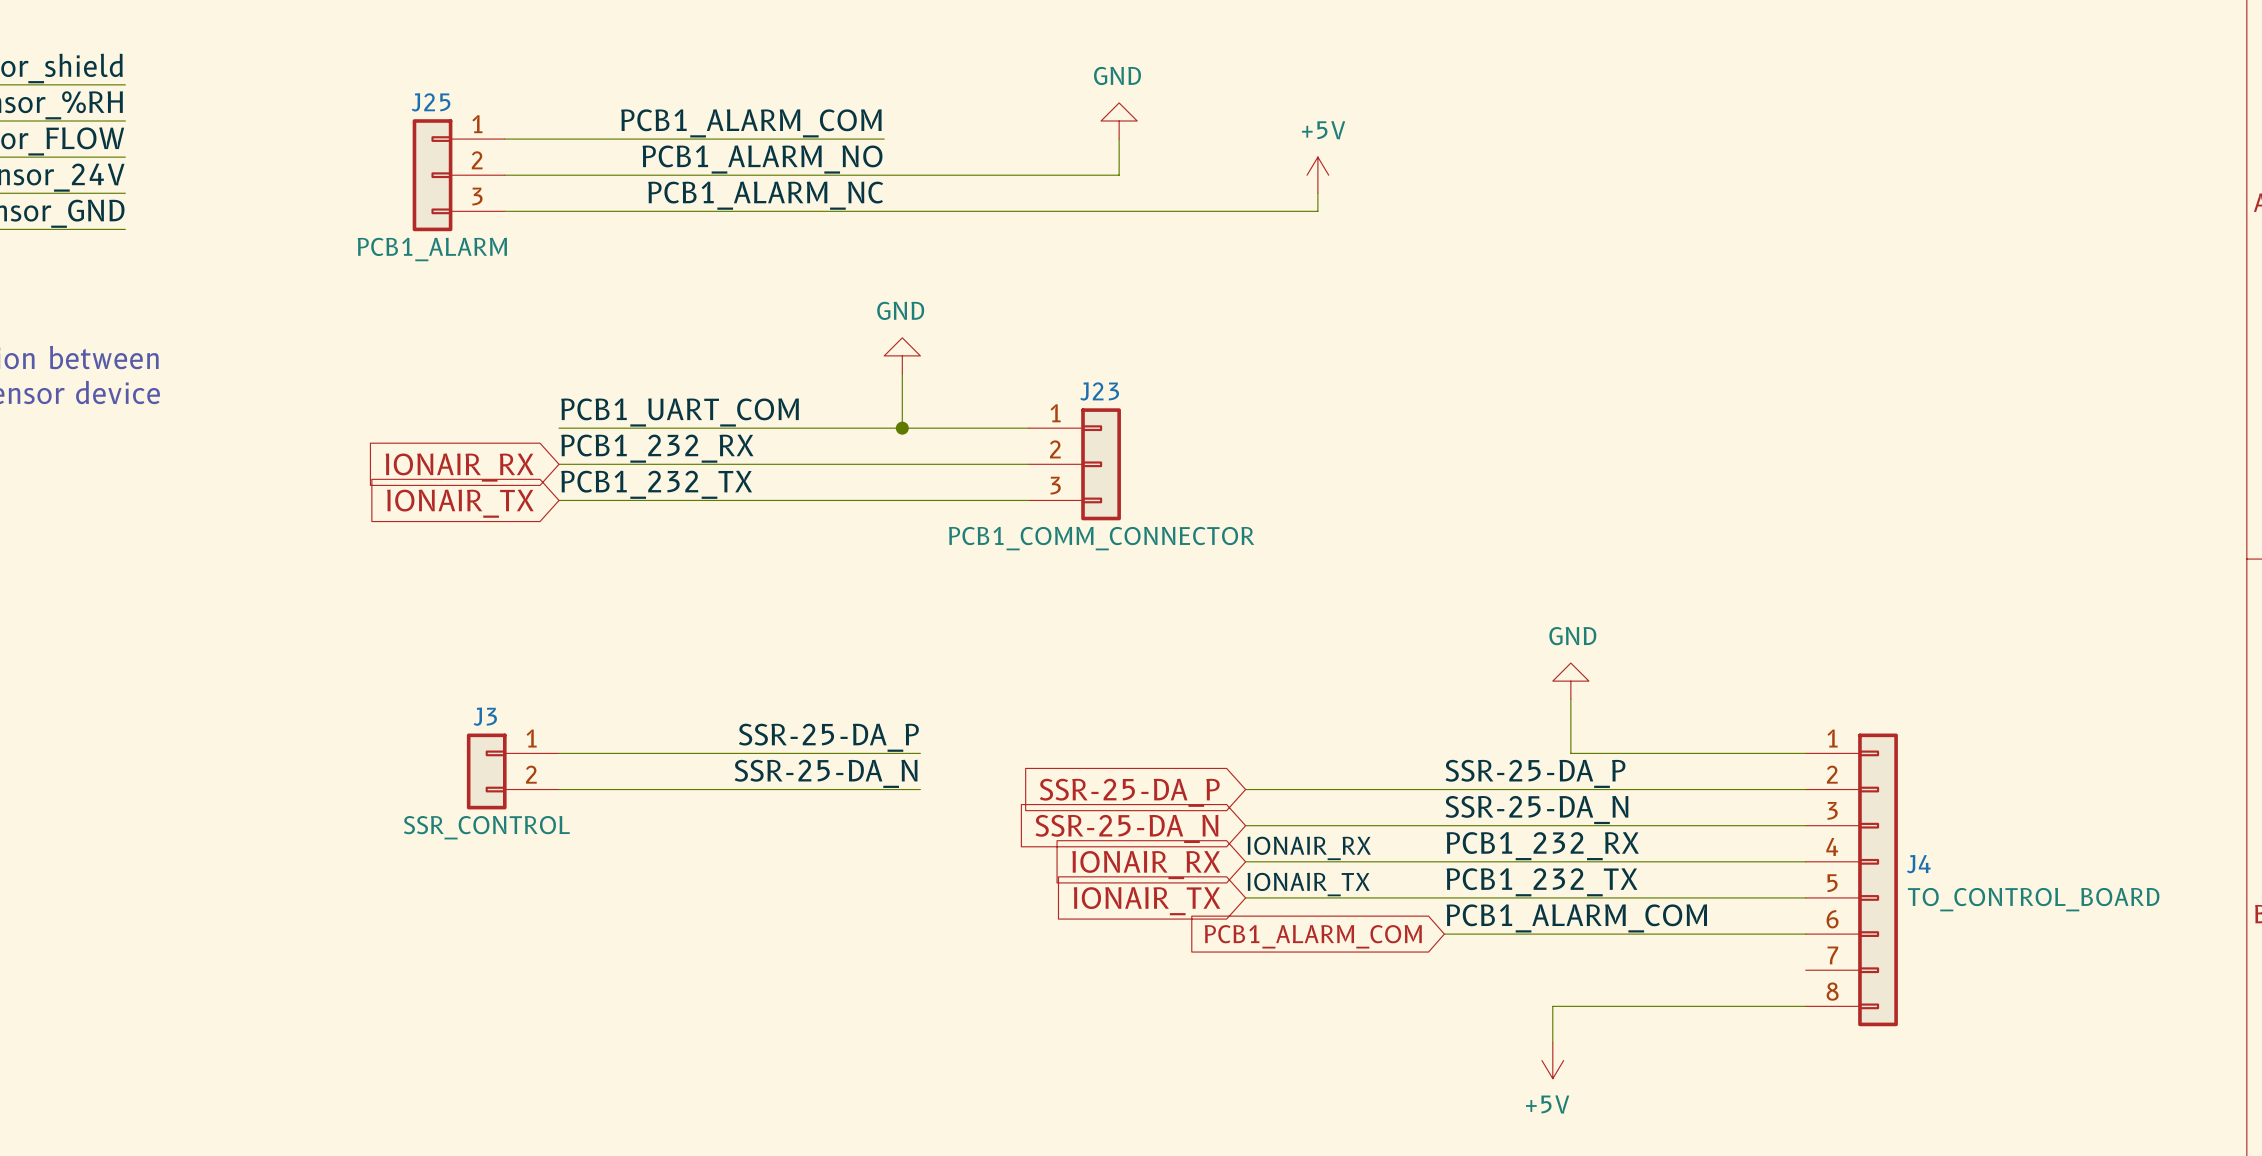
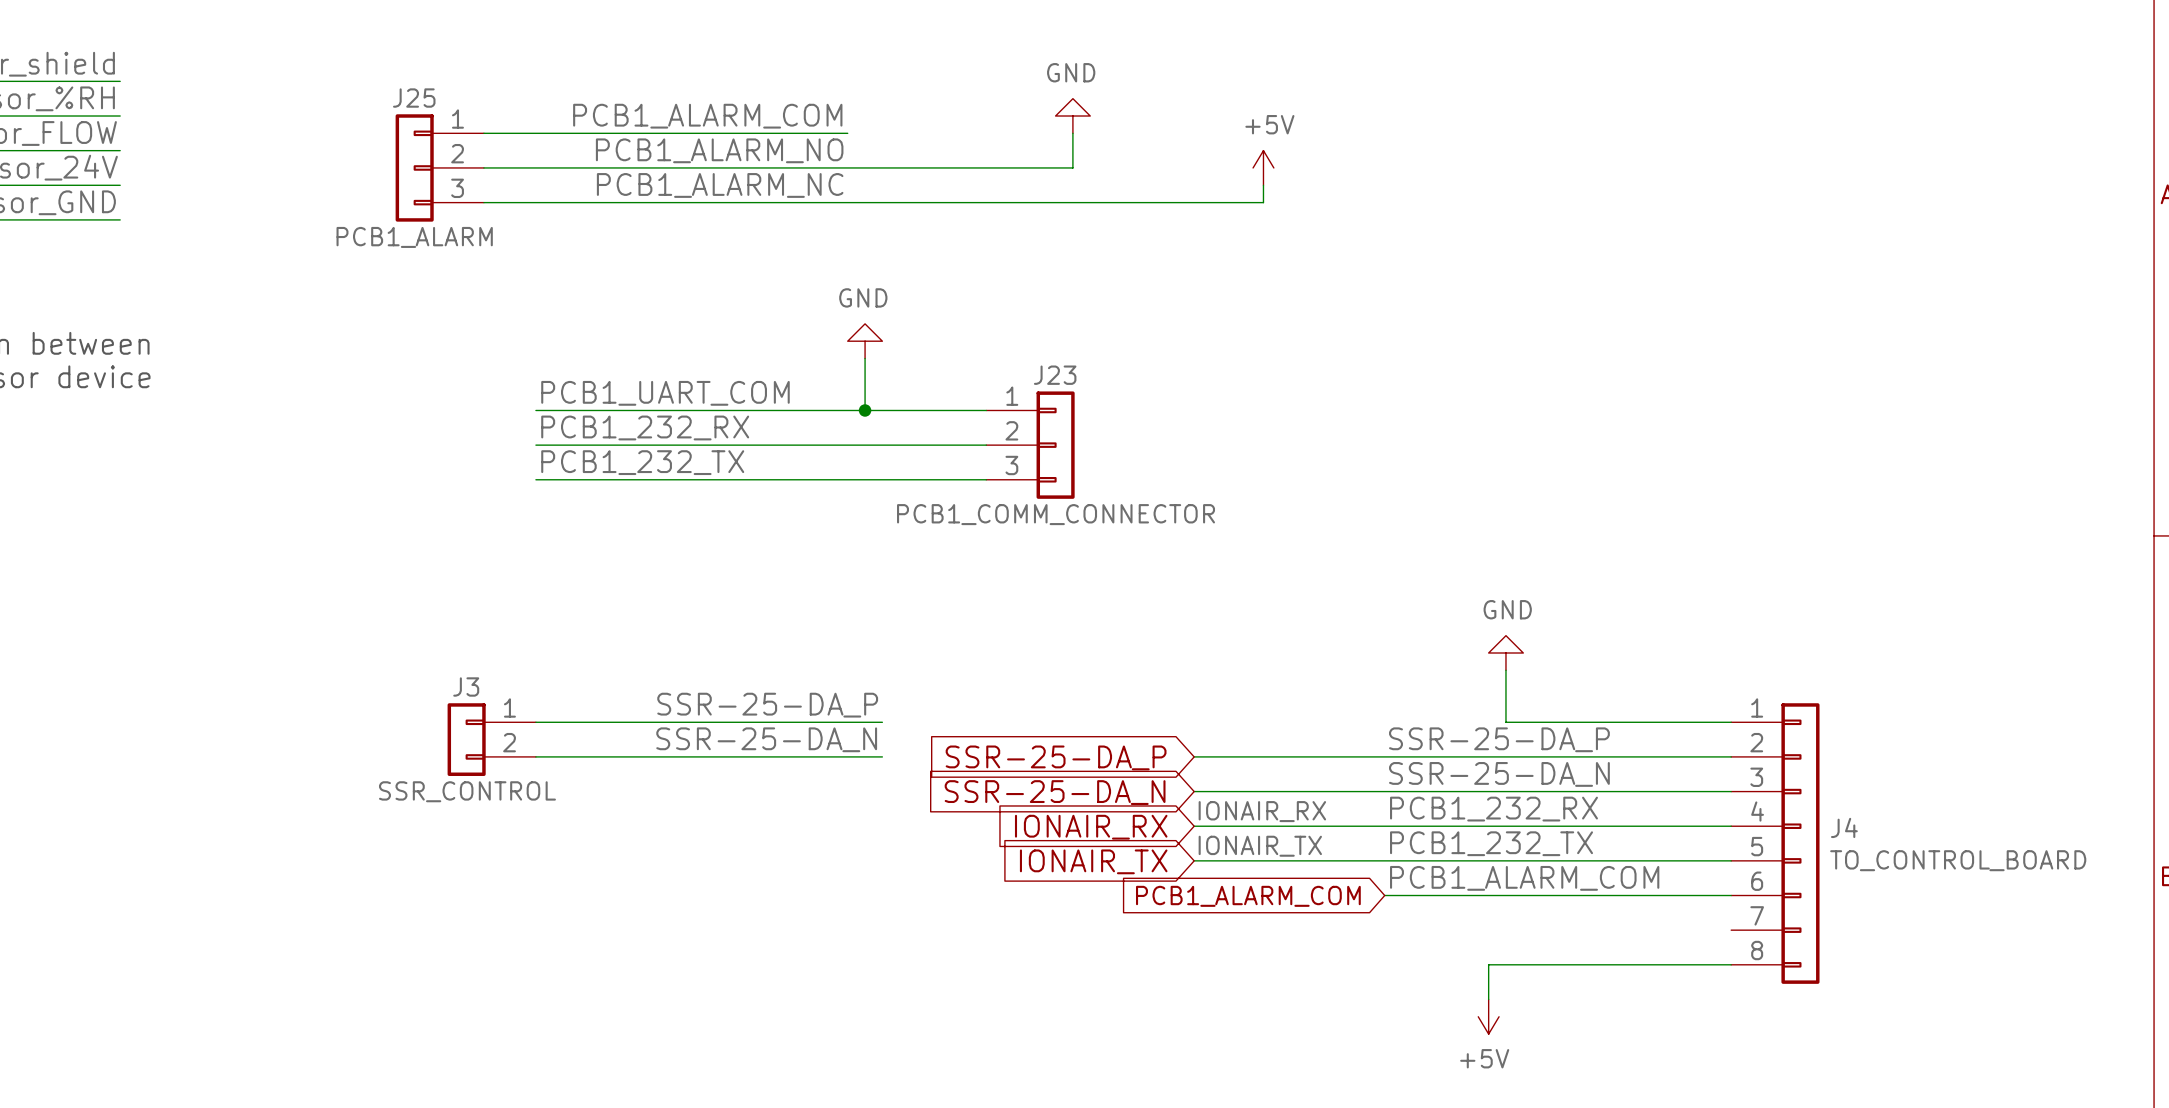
global label: IONAIR_RX (459, 467) -> none
global label: IONAIR_TX (460, 503) -> none

